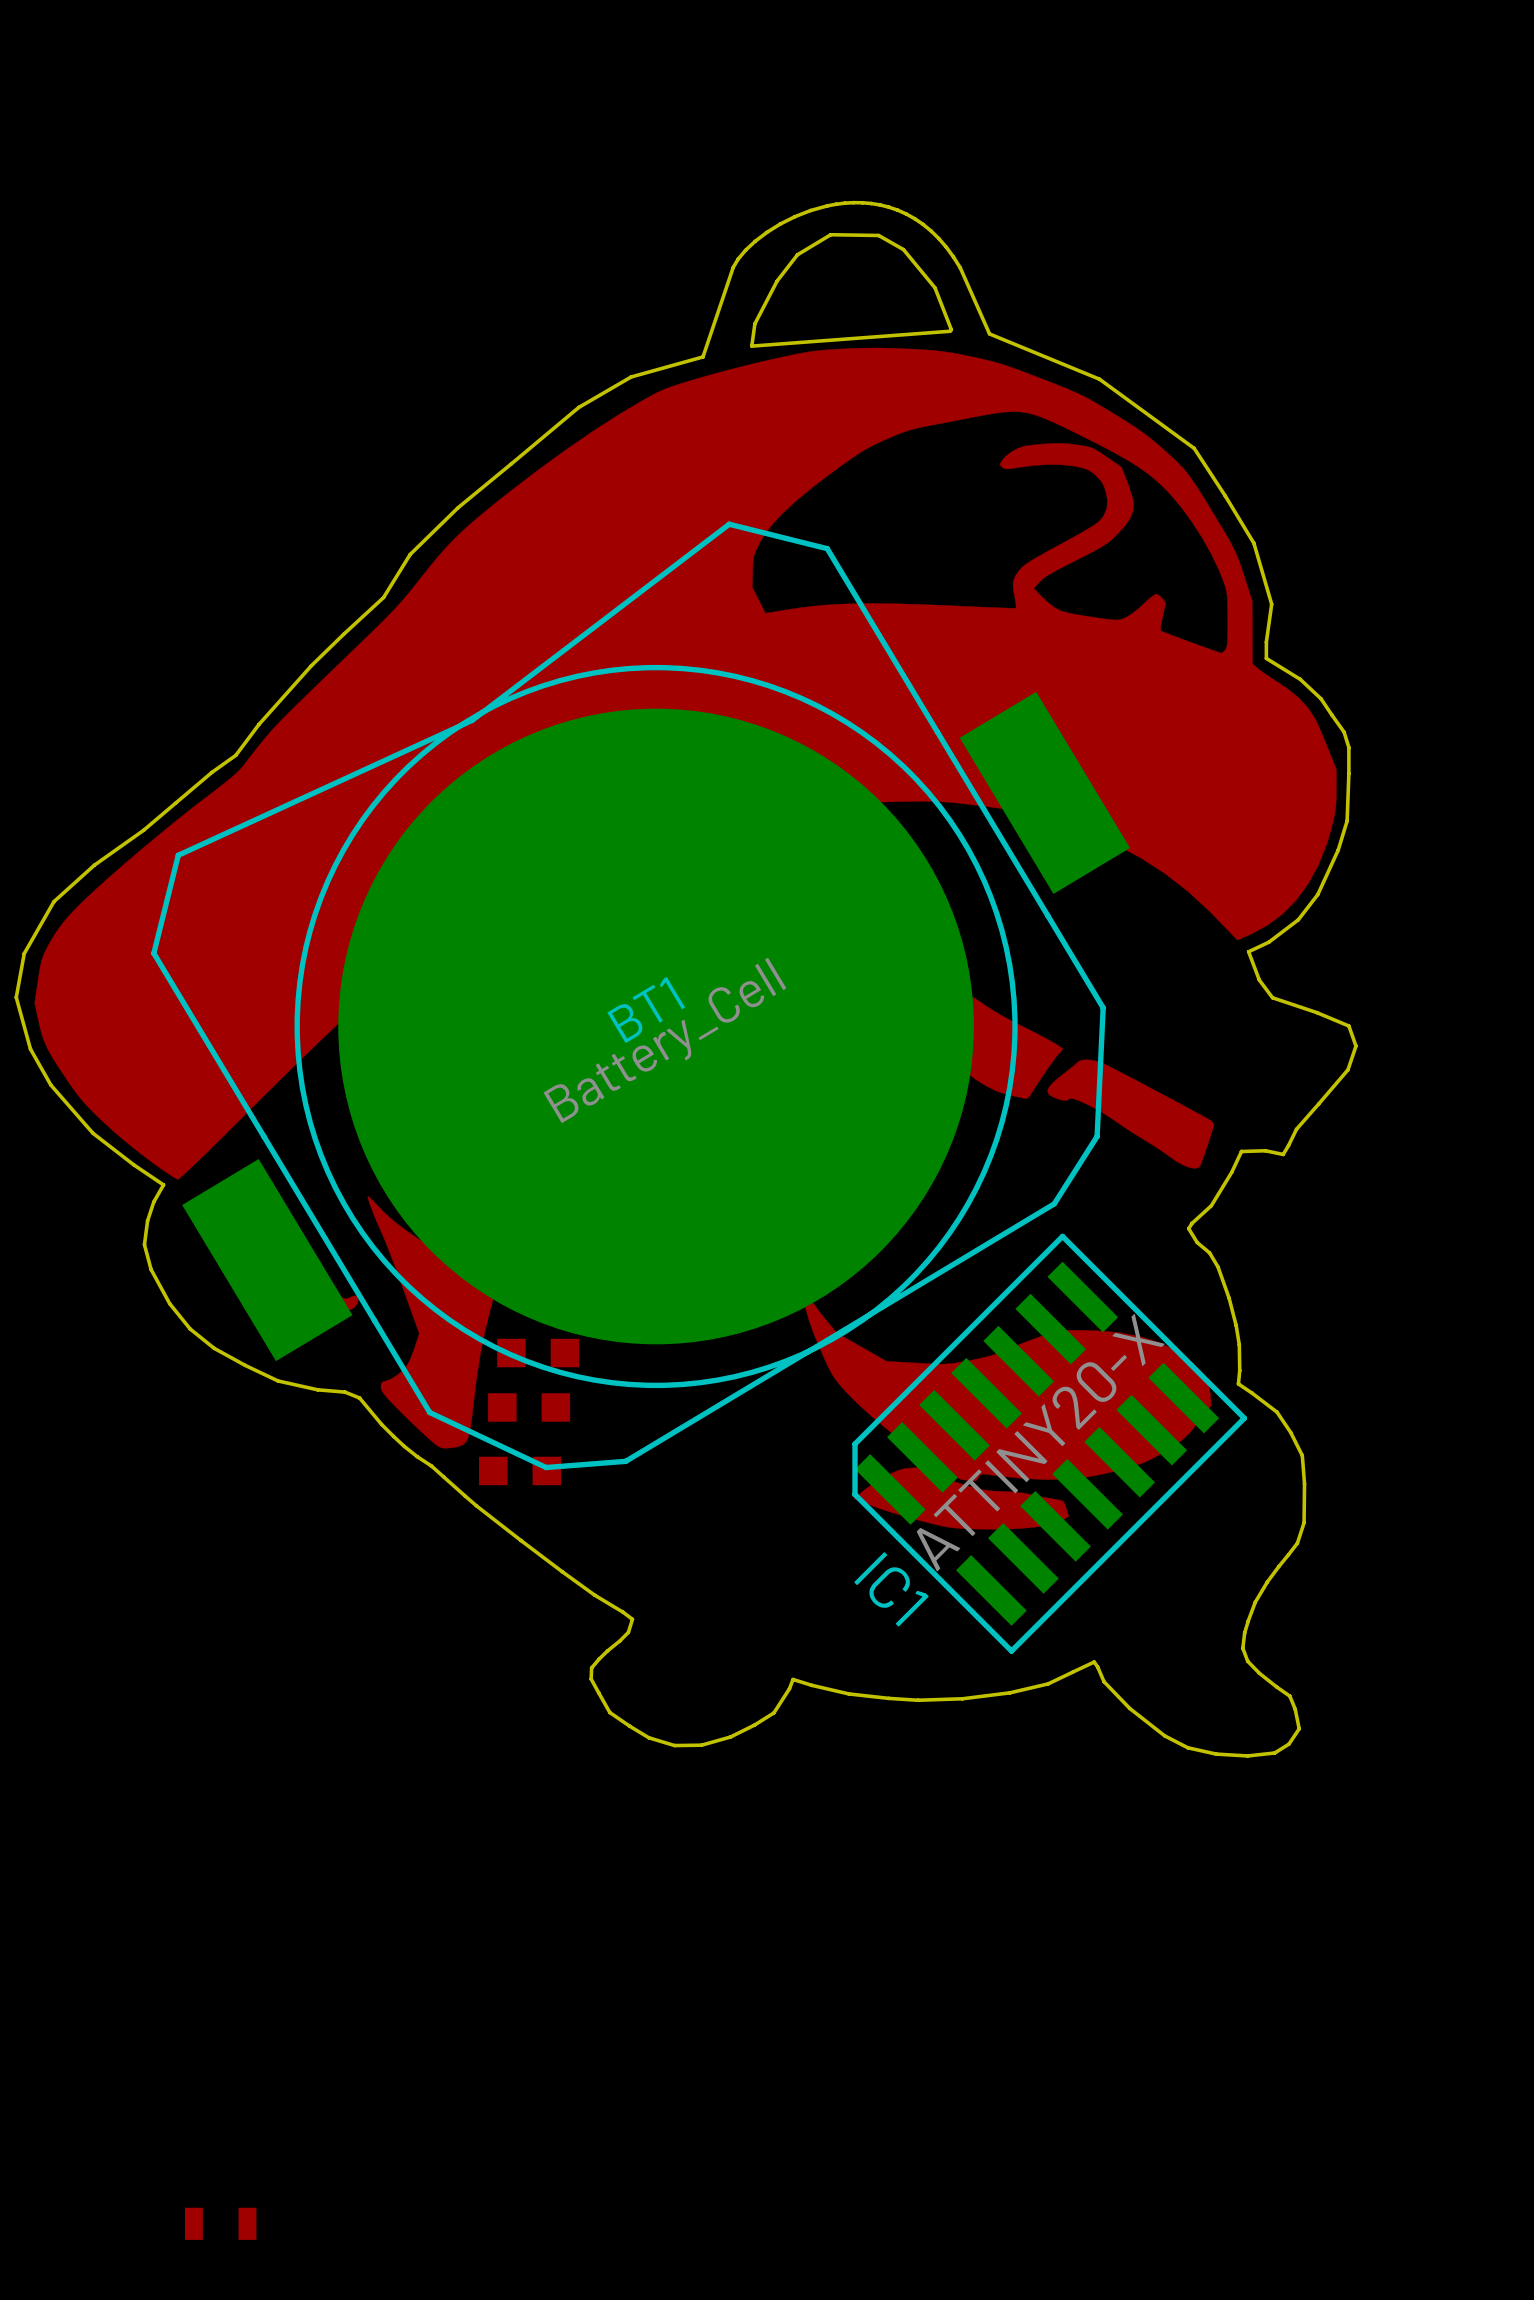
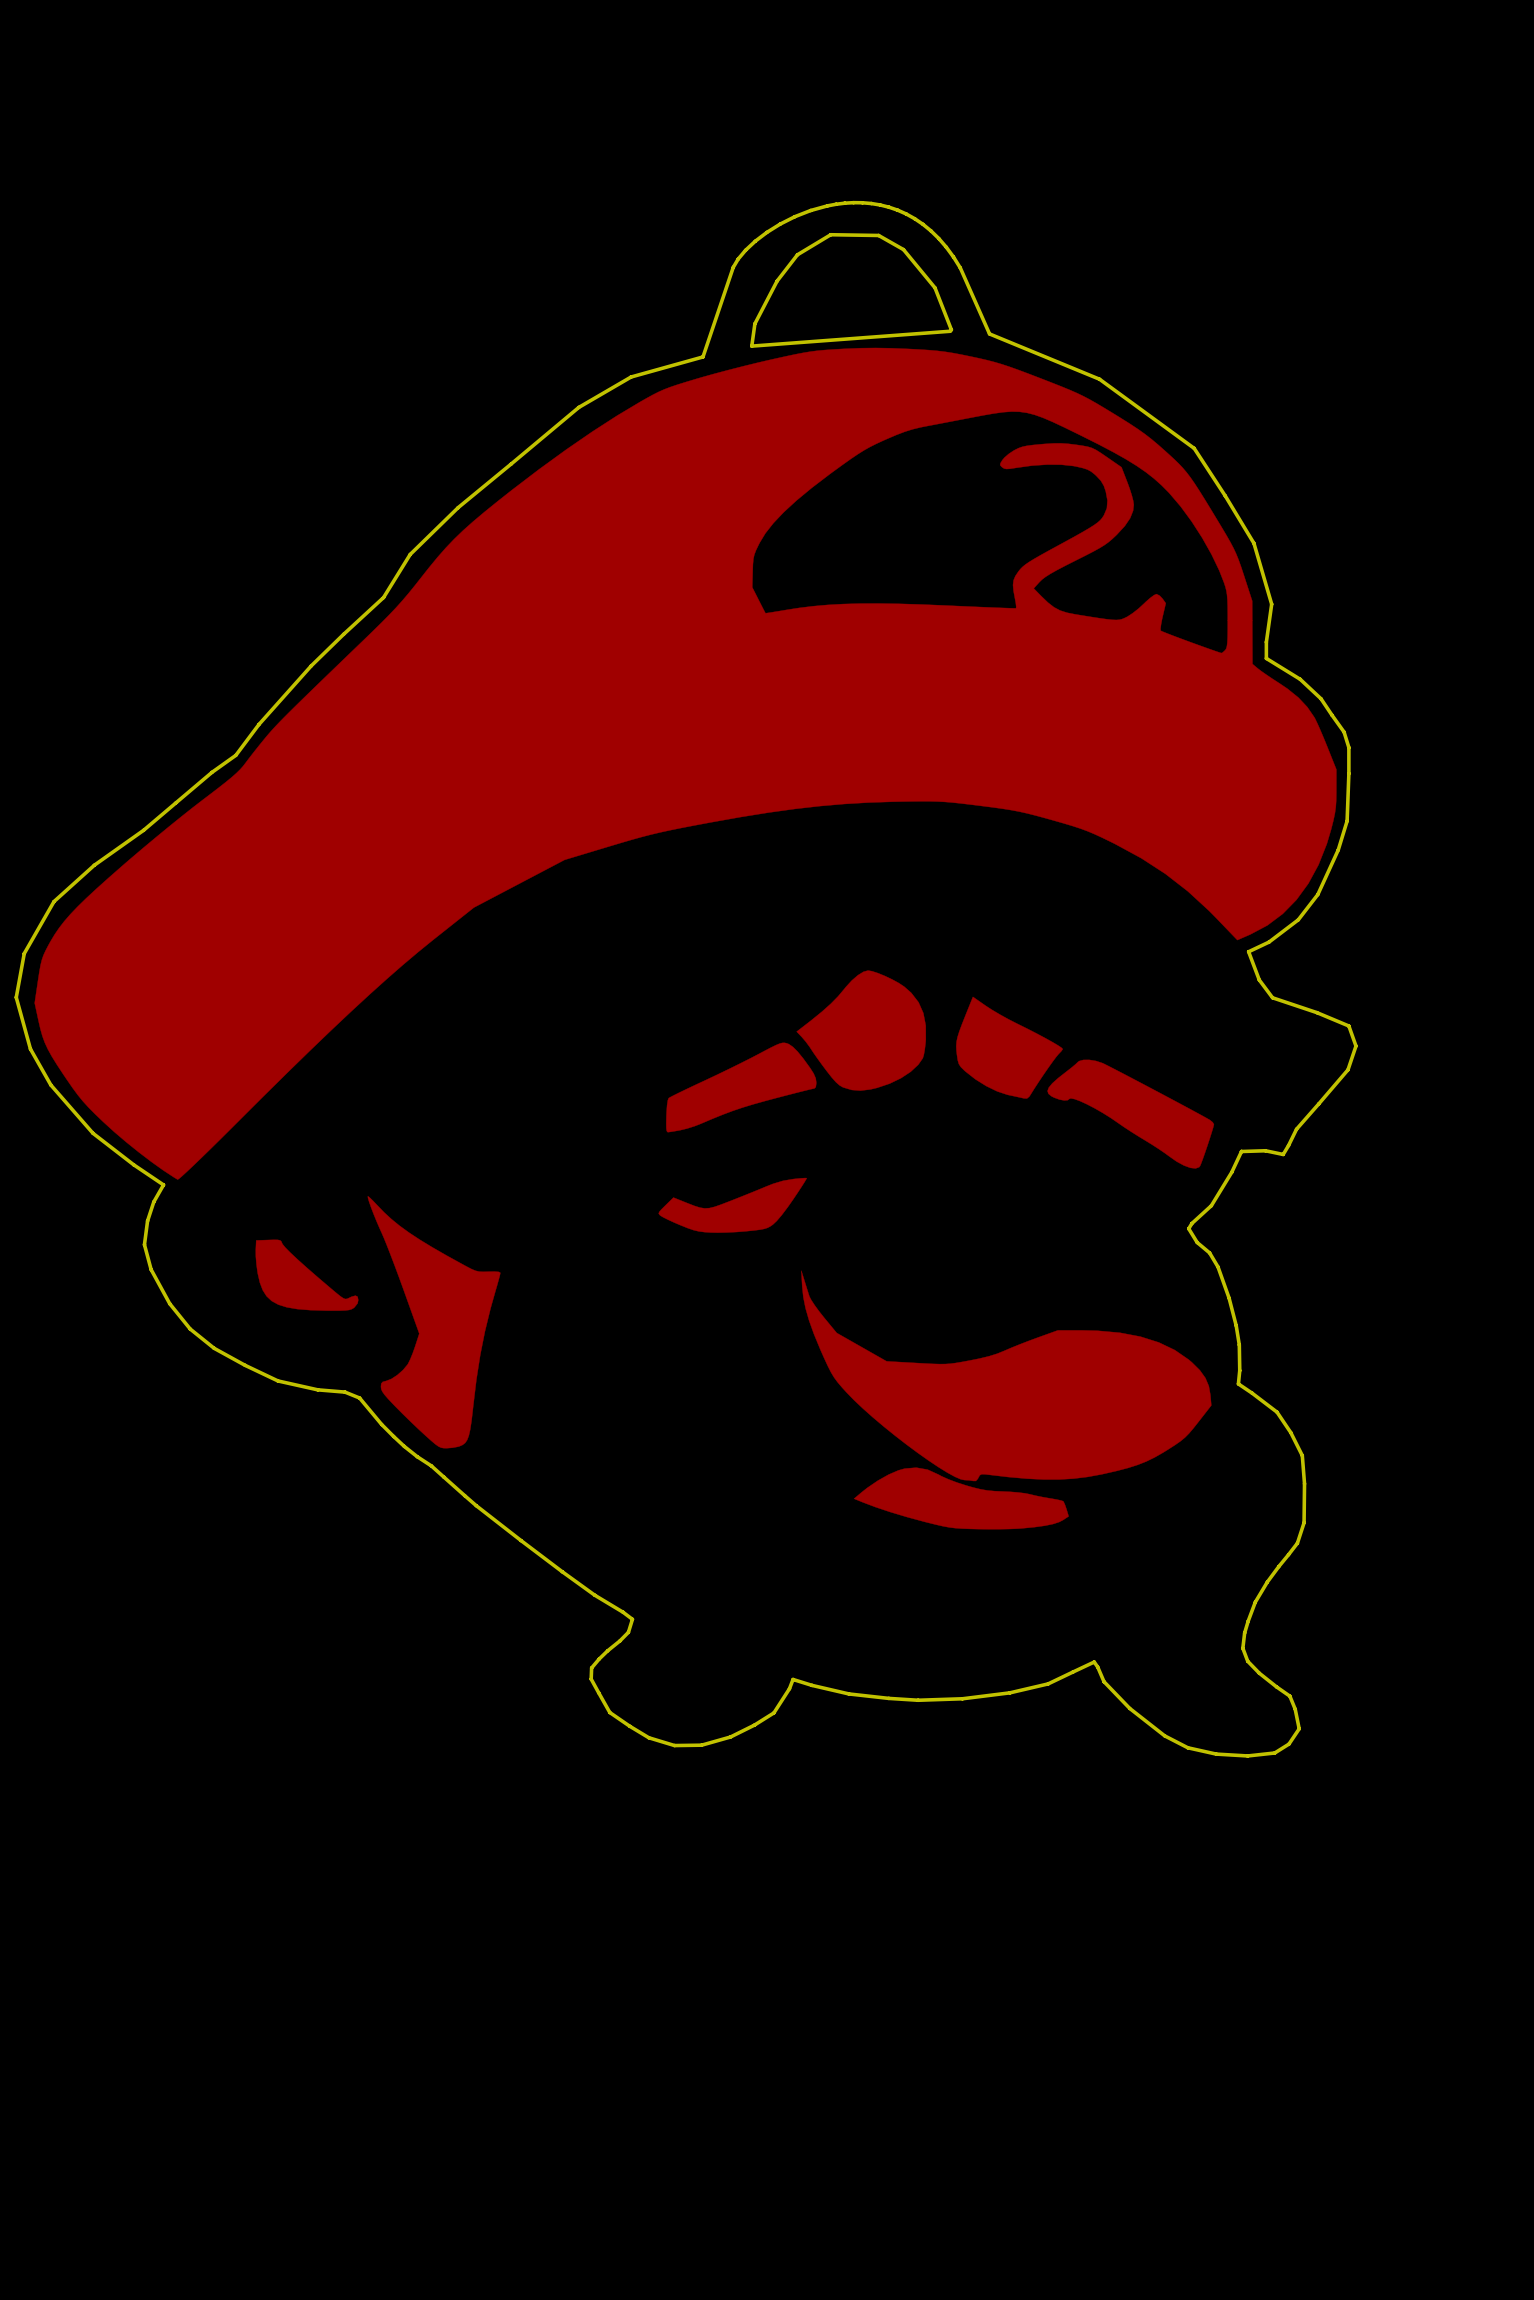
BT1: Battery_Cell (640, 995) -> none
part: (538, 1353) -> none
part: (529, 1407) -> none
IC1: ATTINY20-X (1049, 1443) -> none
part: (520, 1470) -> none
part: (220, 2223) -> none

